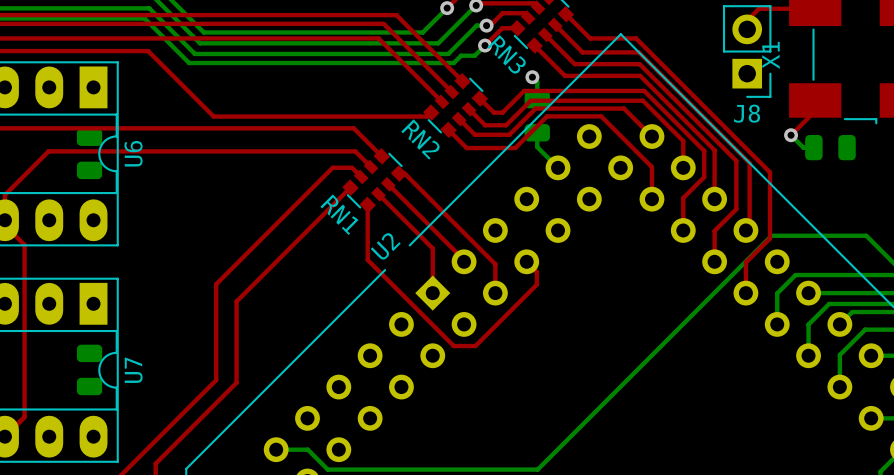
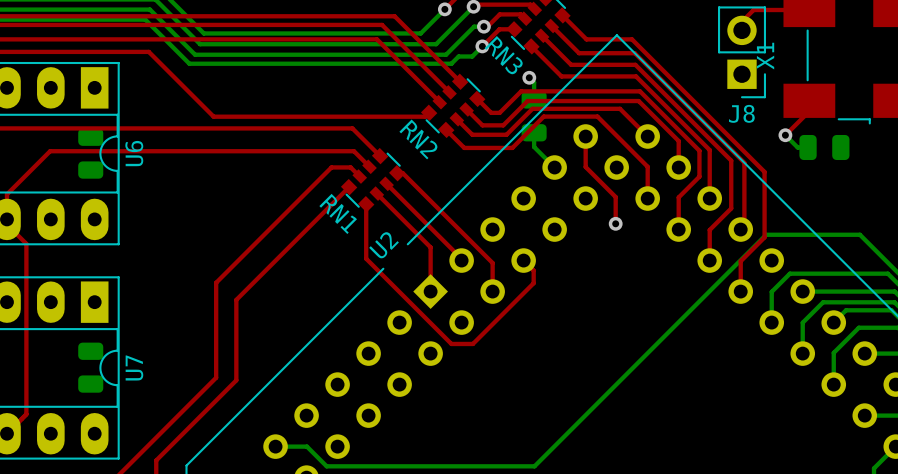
top track: none -> (585, 136) (585, 167) (615, 197) (615, 223)
via: none -> (615, 223)

